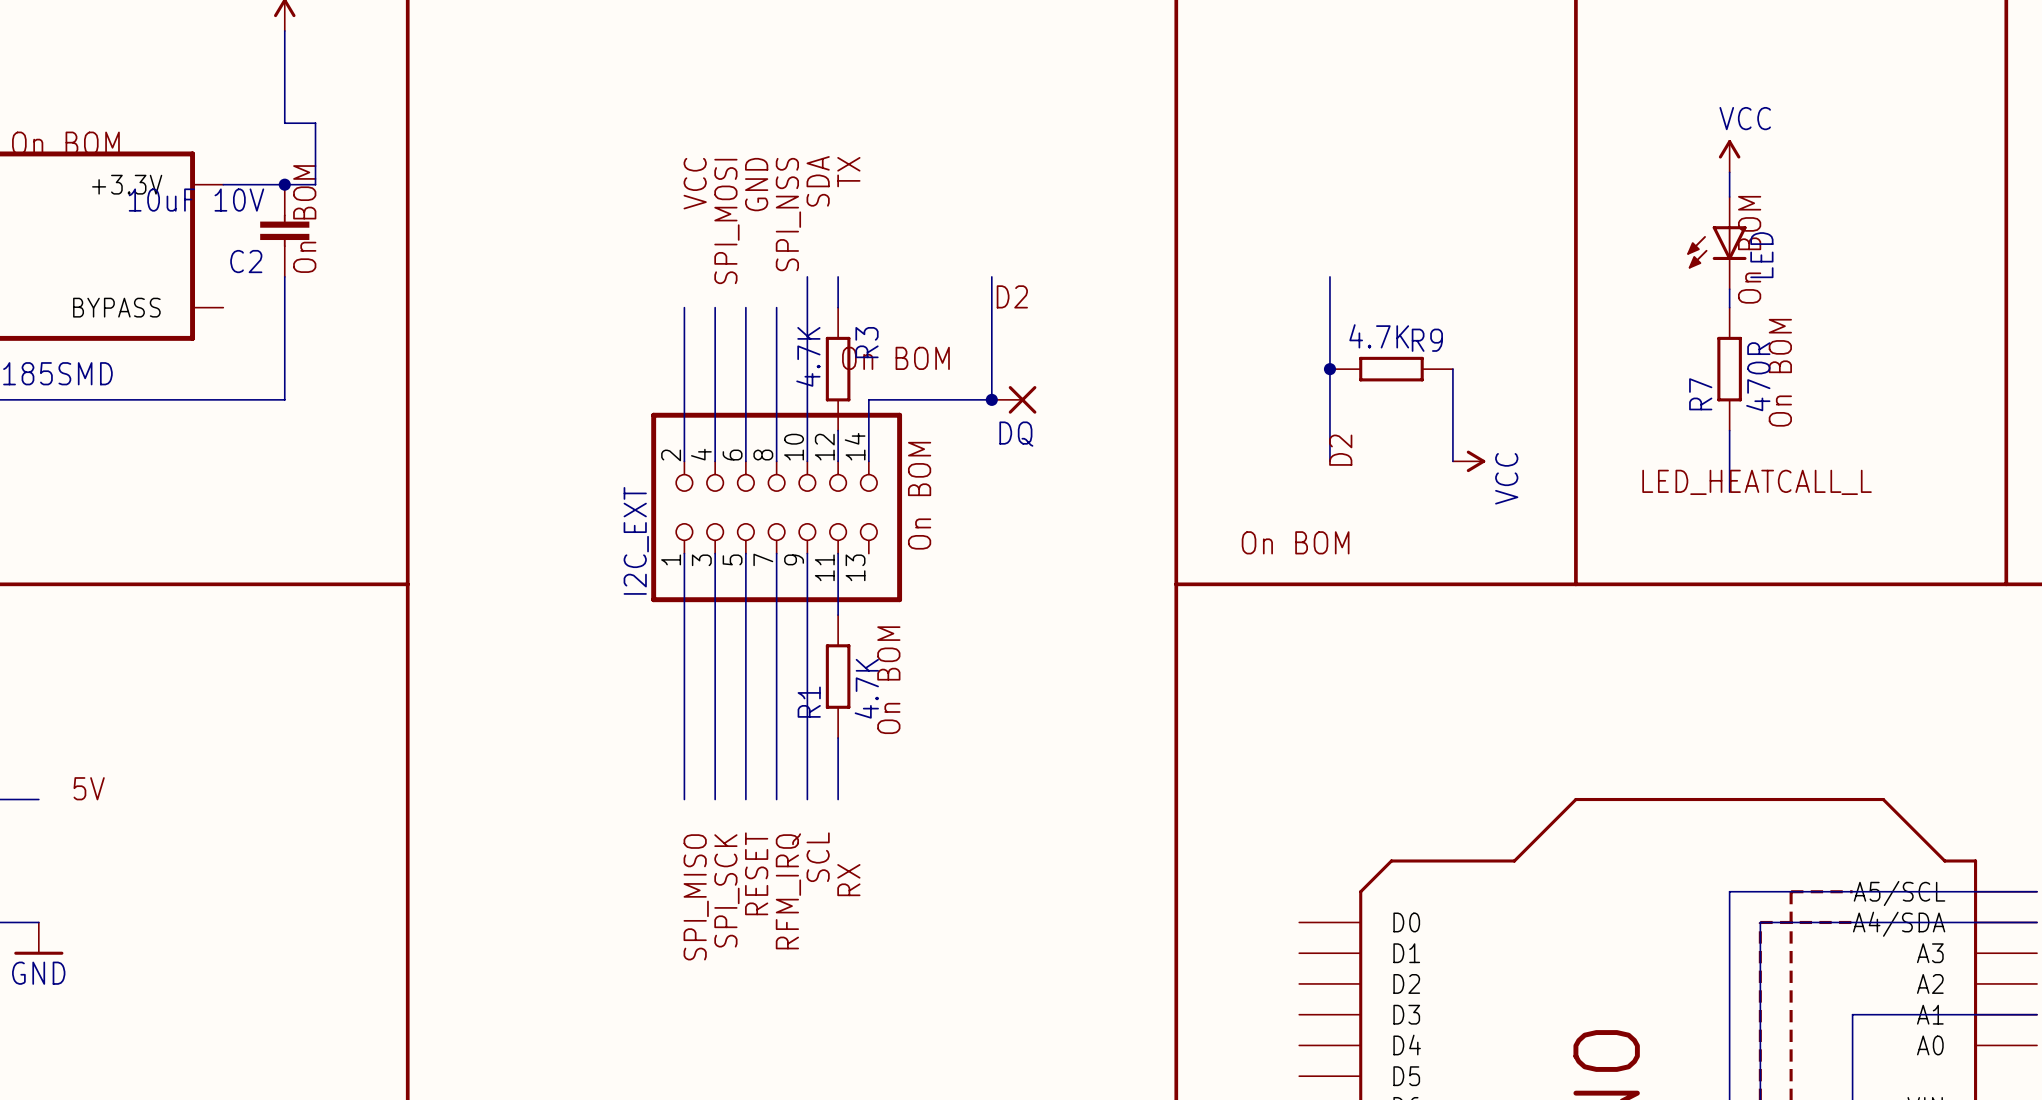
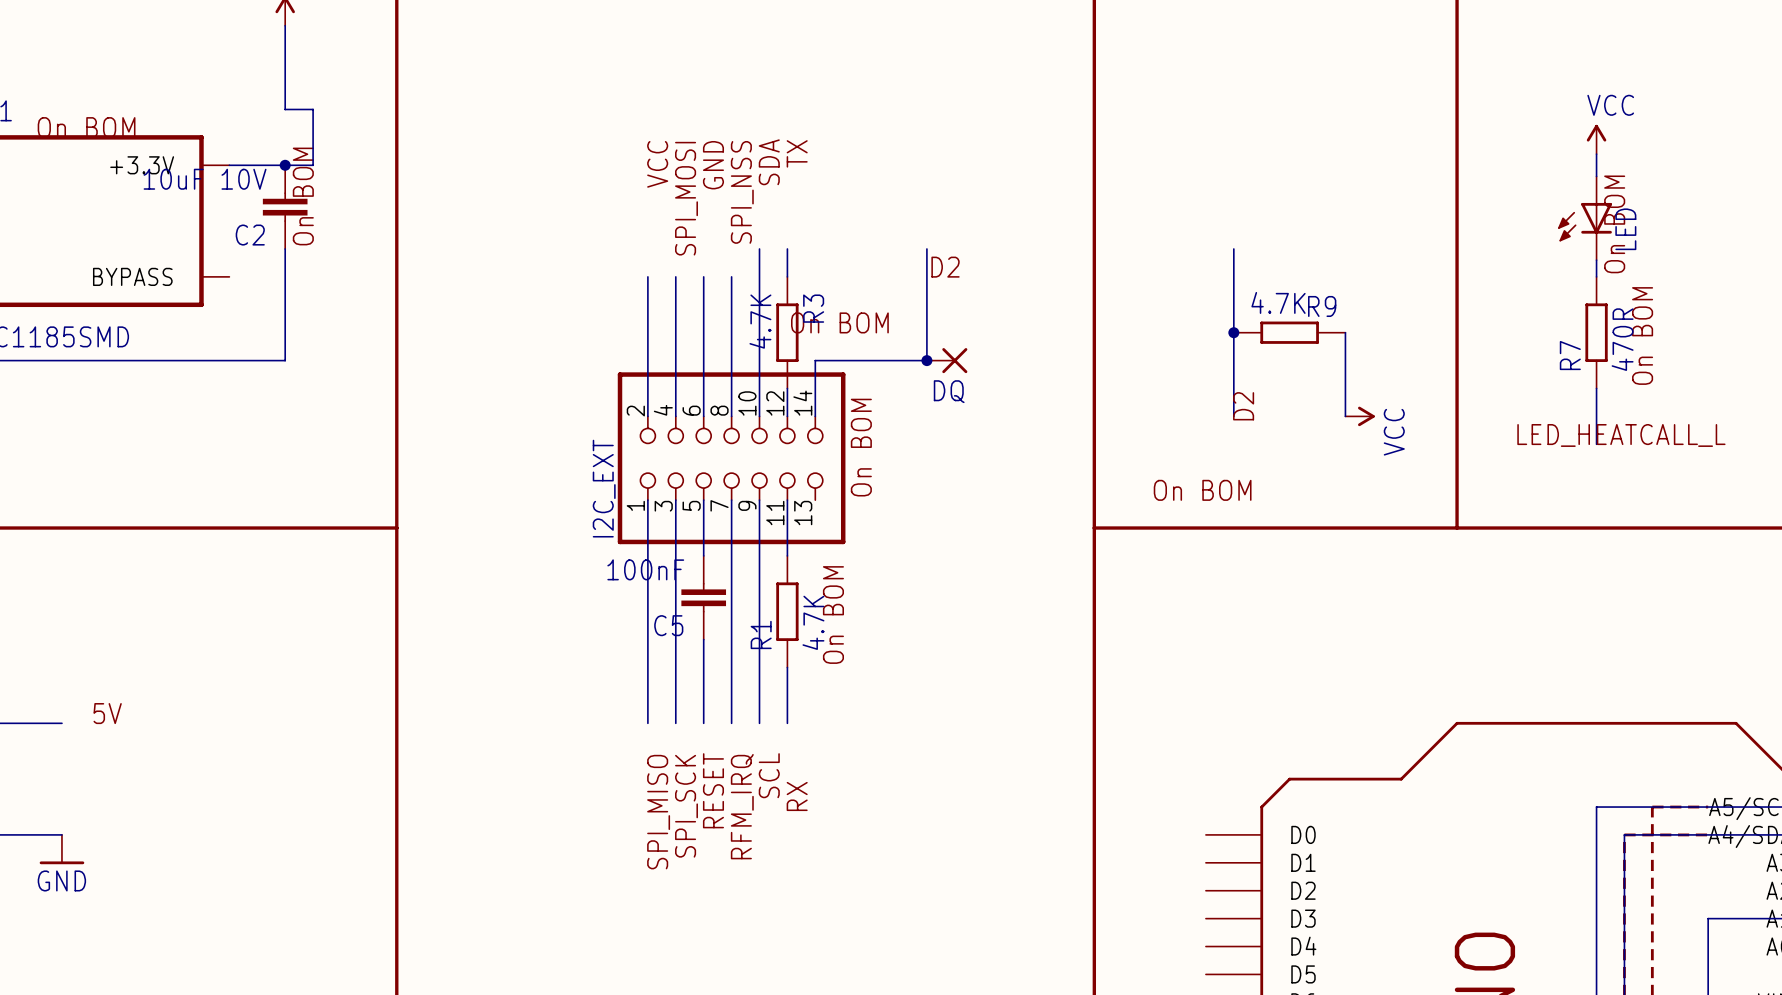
C5: none -> 100nF (703, 597)

